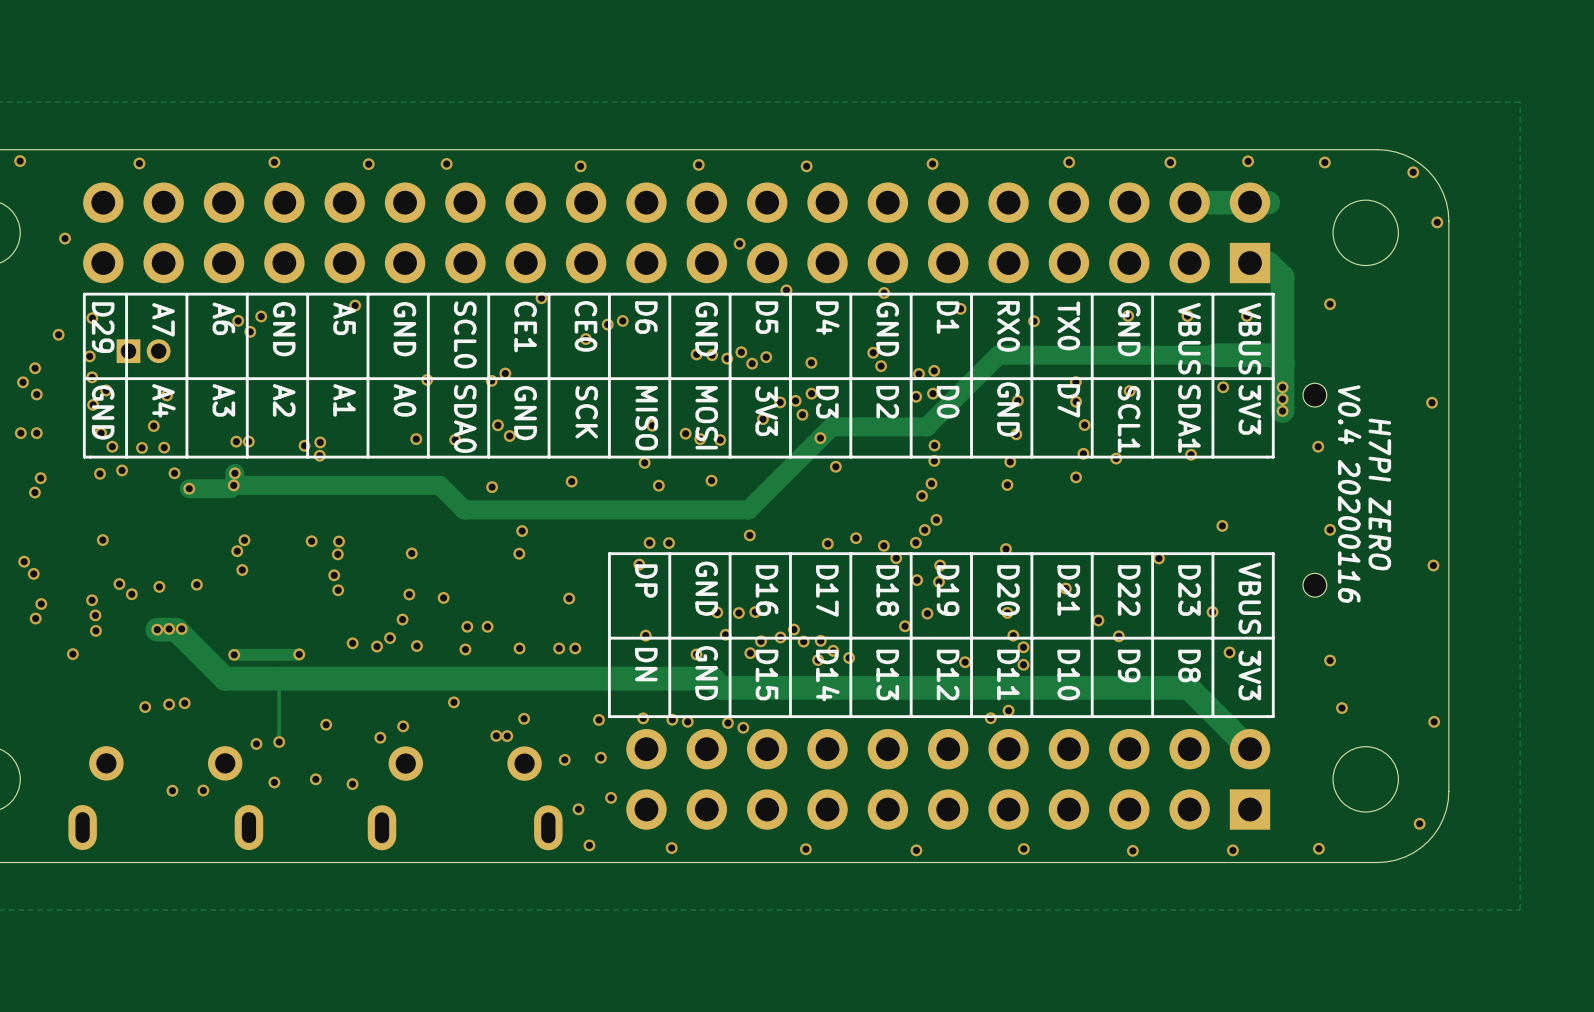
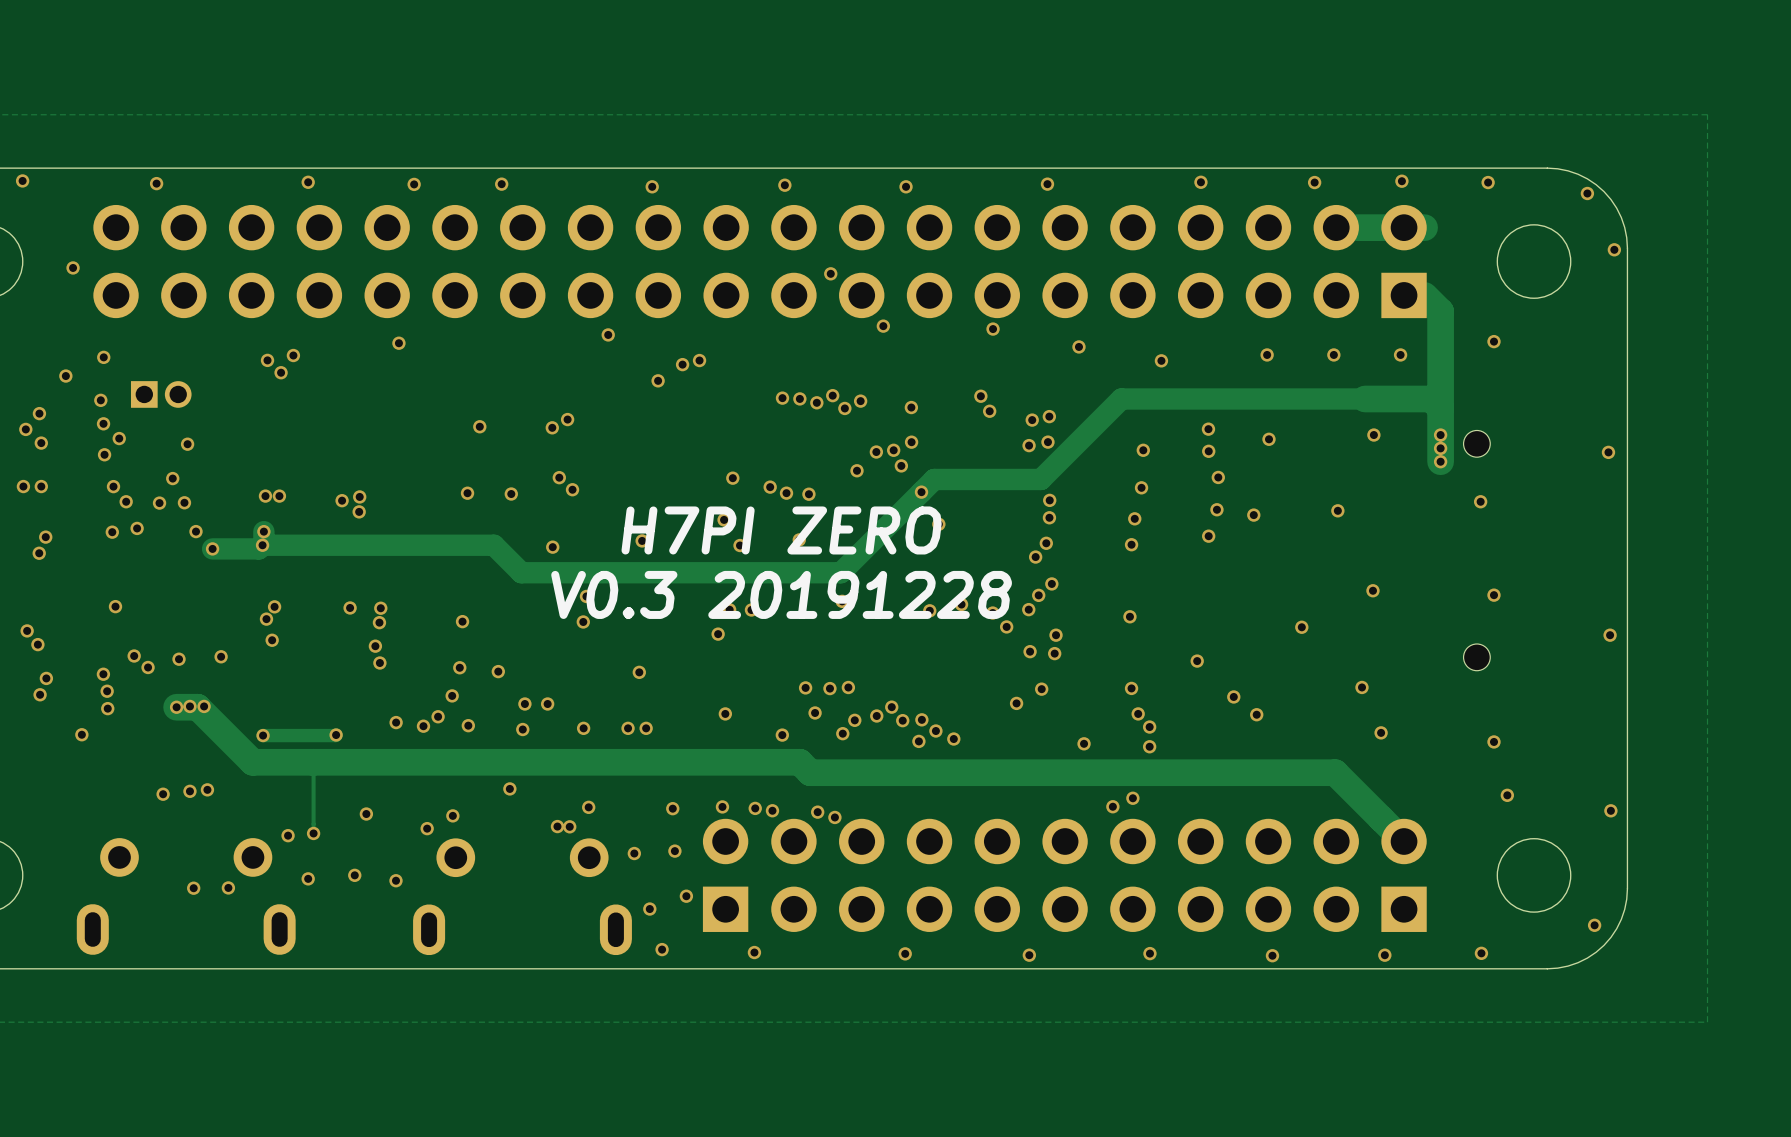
line: (126, 294) (126, 457) -> none
line: (186, 294) (186, 457) -> none
line: (247, 294) (247, 457) -> none
line: (307, 294) (307, 457) -> none
line: (367, 294) (367, 457) -> none
line: (428, 294) (428, 457) -> none
line: (488, 294) (488, 457) -> none
line: (549, 294) (549, 457) -> none
line: (609, 294) (609, 457) -> none
line: (669, 294) (669, 457) -> none
line: (730, 294) (730, 457) -> none
line: (790, 294) (790, 457) -> none
line: (850, 294) (850, 457) -> none
line: (911, 294) (911, 457) -> none
line: (971, 294) (971, 457) -> none
line: (1031, 294) (1031, 457) -> none
line: (1092, 294) (1092, 457) -> none
line: (1152, 294) (1152, 457) -> none
line: (1212, 294) (1212, 457) -> none
line: (1273, 294) (1273, 457) (84, 457) (84, 294) (1273, 294) -> none
text: D6 (646, 317) -> none
text: D5 (767, 317) -> none
text: D1 (948, 317) -> none
text: A6 (223, 318) -> none
text: A5 (344, 318) -> none
text: D4 (827, 318) -> none
text: A7 (163, 319) -> none
text: TX0 (1068, 325) -> none
text: CE1 (525, 326) -> none
text: CE0 (585, 326) -> none
text: RX0 (1008, 326) -> none
text: D29 (103, 327) -> none
text: GND (284, 329) -> none
text: GND (404, 329) -> none
text: GND (706, 329) -> none
text: GND (887, 329) -> none
text: GND (1129, 329) -> none
text: SCL0 (465, 334) -> none
text: VBUS (1189, 338) -> none
text: VBUS (1249, 338) -> none
line: (1273, 378) (84, 378) -> none
text: A4 (163, 400) -> none
text: A3 (223, 400) -> none
text: A2 (284, 400) -> none
text: A1 (344, 400) -> none
text: A0 (404, 400) -> none
text: D7 (1068, 400) -> none
text: D3 (827, 402) -> none
text: D2 (887, 402) -> none
text: D0 (948, 402) -> none
text: GND (1008, 409) -> none
text: 3V3 (1249, 409) -> none
text: 3V3 (766, 411) -> none
text: GND (103, 412) -> none
text: SCK (586, 412) -> none
text: GND (525, 413) -> none
text: MOSI (706, 417) -> H7PI ZERO (781, 530)
text: SDA0 (465, 418) -> none
text: MISO (646, 418) -> none
text: SDA1 (1189, 418) -> none
text: SCL1 (1129, 419) -> none
text: V0.4 20200116 (1349, 494) -> none
text: H7PI ZERO (1379, 494) -> none
text: none -> V0.3 20191228 (781, 594)
line: (669, 553) (669, 716) -> none
line: (730, 553) (730, 716) -> none
line: (790, 553) (790, 716) -> none
line: (850, 553) (850, 716) -> none
line: (911, 553) (911, 716) -> none
line: (971, 553) (971, 716) -> none
line: (1031, 553) (1031, 716) -> none
line: (1092, 553) (1092, 716) -> none
line: (1152, 553) (1152, 716) -> none
line: (1212, 553) (1212, 716) -> none
line: (1273, 553) (1273, 716) (609, 716) (609, 553) (1273, 553) -> none
text: DP (646, 581) -> none
text: GND (706, 588) -> none
text: D16 (767, 590) -> none
text: D17 (827, 590) -> none
text: D18 (887, 590) -> none
text: D19 (948, 590) -> none
text: D20 (1008, 590) -> none
text: D21 (1068, 590) -> none
text: D22 (1129, 590) -> none
text: D23 (1189, 590) -> none
text: VBUS (1249, 598) -> none
line: (1273, 638) (609, 638) -> none
text: DN (646, 664) -> none
text: D9 (1129, 665) -> none
text: D8 (1189, 665) -> none
text: GND (706, 673) -> none
text: D15 (767, 675) -> none
text: D14 (827, 675) -> none
text: D13 (887, 675) -> none
text: D12 (948, 675) -> none
text: D11 (1008, 675) -> none
text: D10 (1068, 675) -> none
text: 3V3 (1249, 675) -> none
part: none -> (725, 875)
part: (948, 779) -> none

